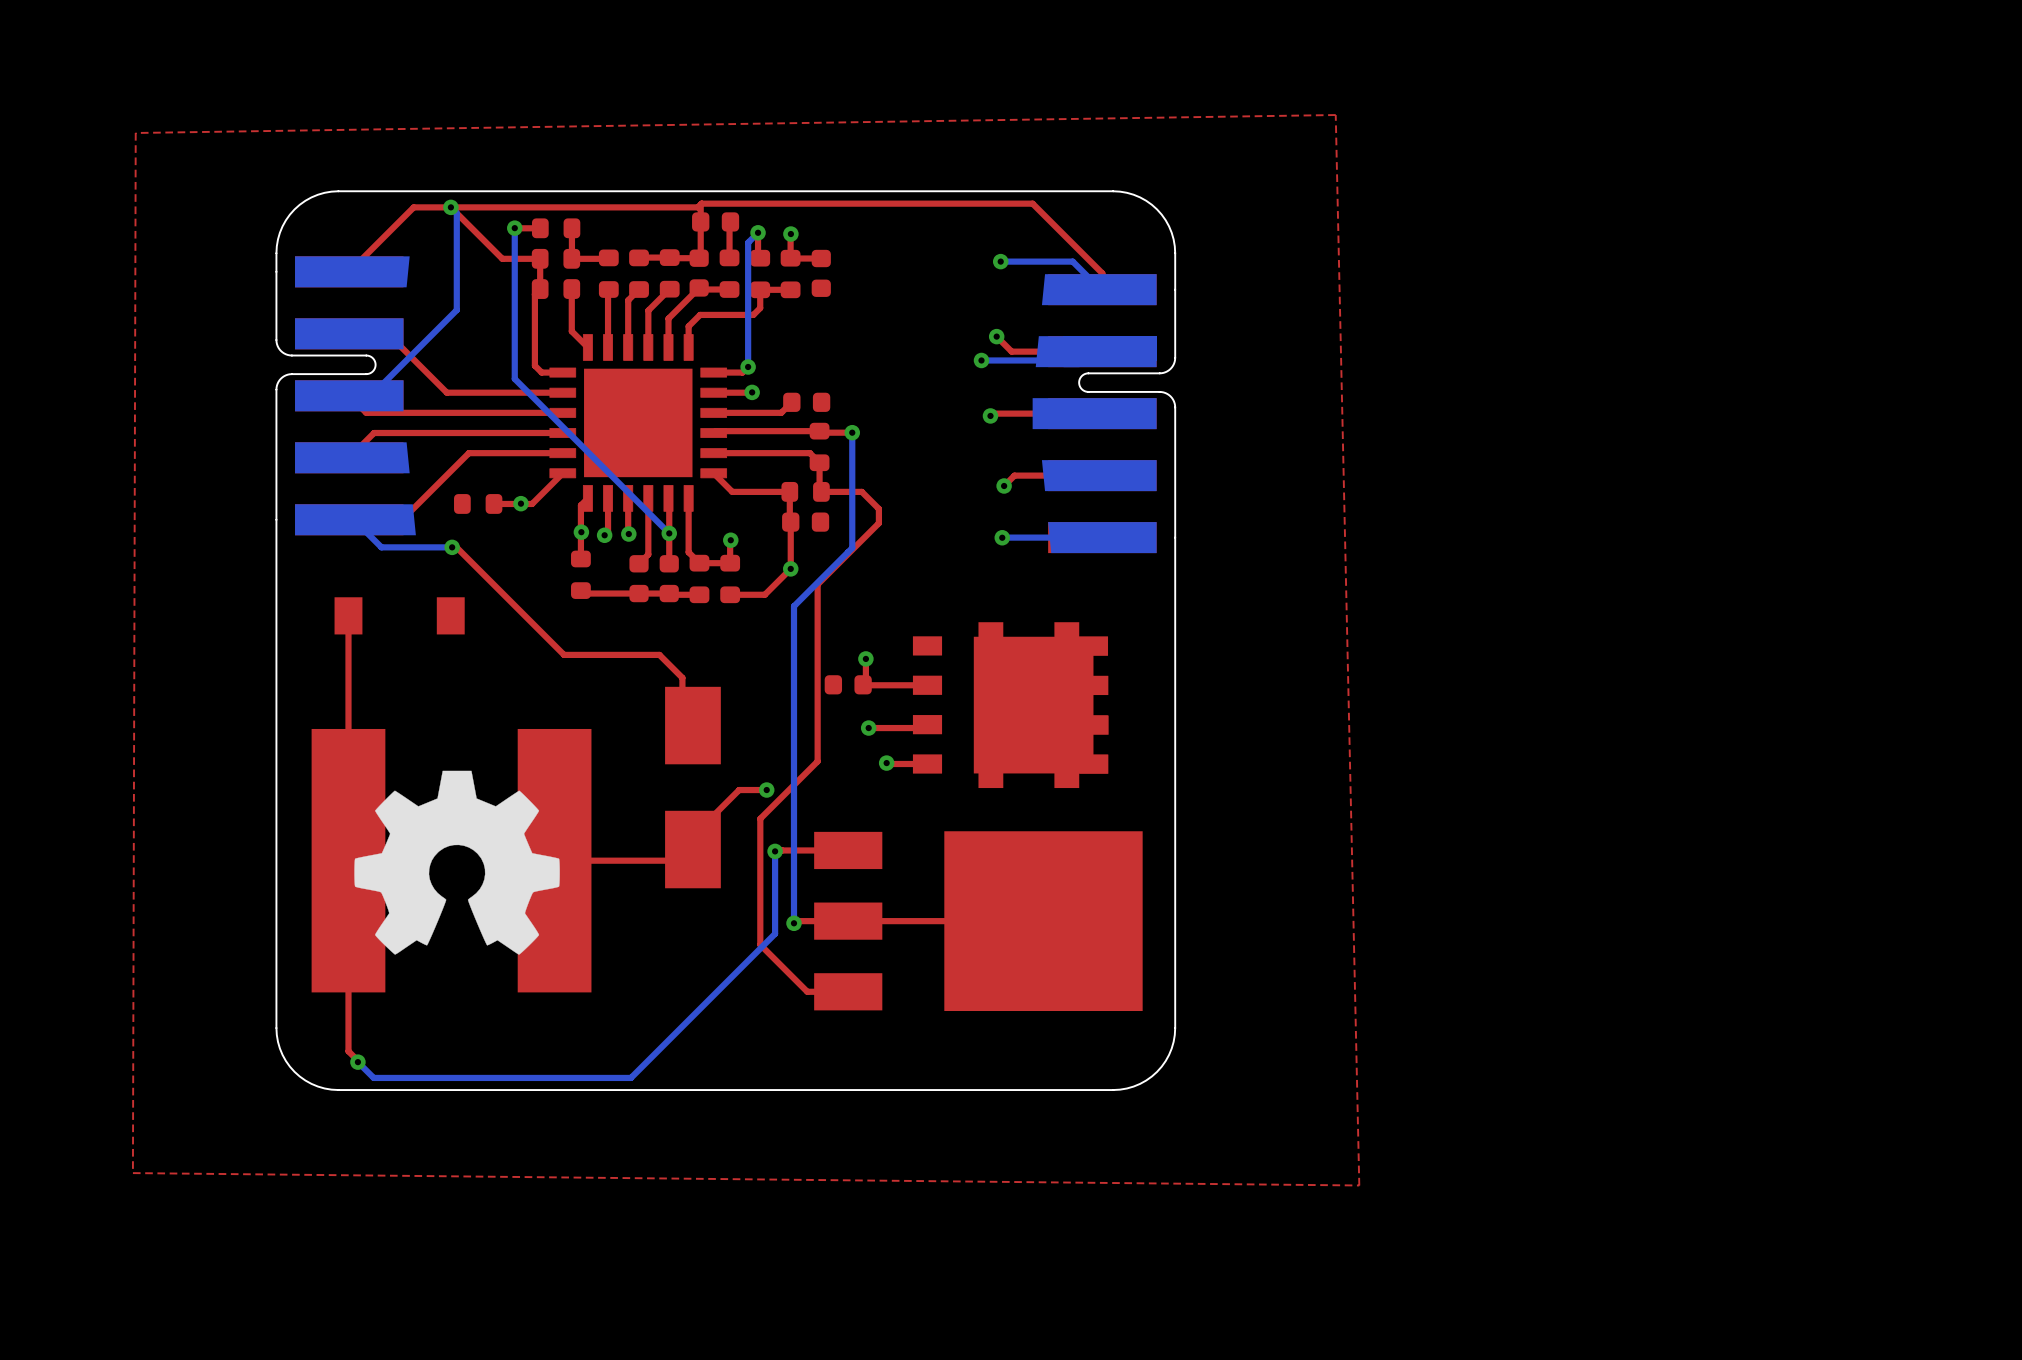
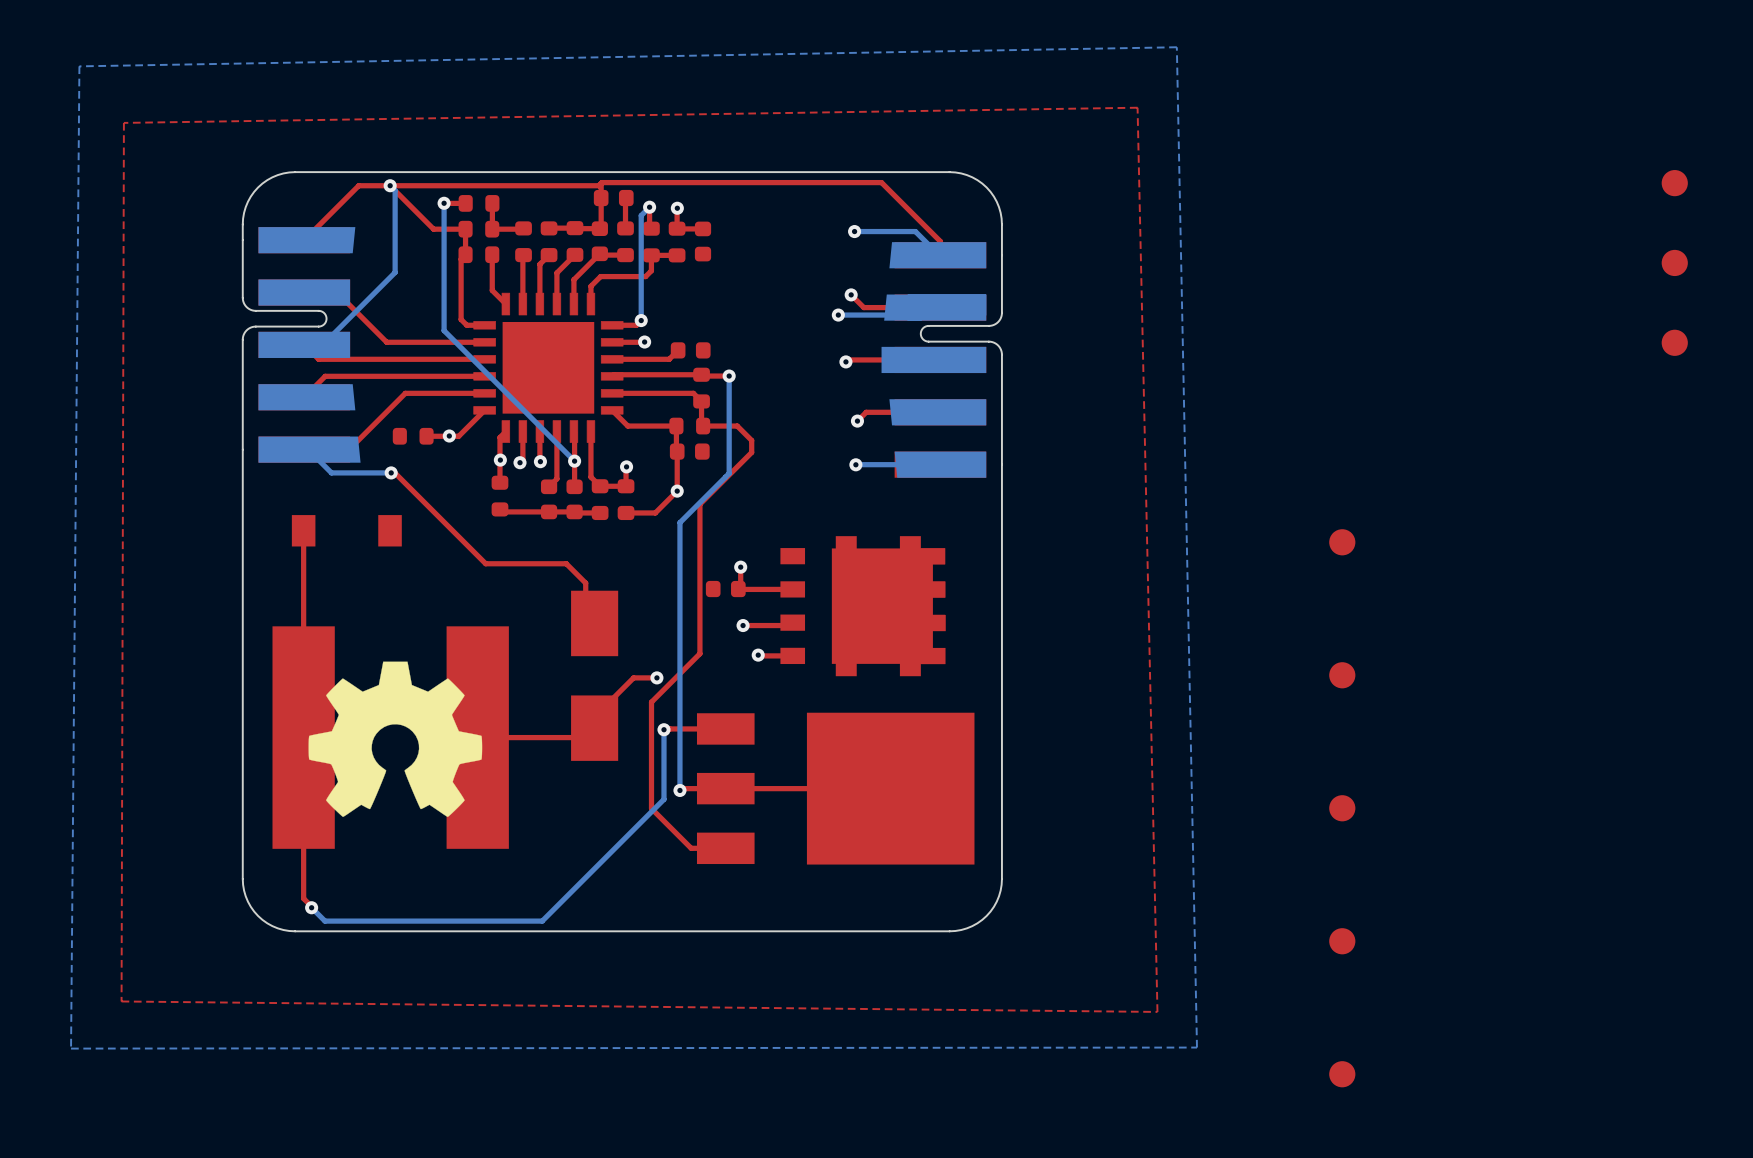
bottom zone outline: none -> (1176, 47) (79, 66) (71, 1048) (1196, 1047) (1176, 47)
part: none -> (1674, 183)
part: none -> (1674, 262)
part: none -> (1674, 342)
part: none -> (1342, 542)
part: none -> (1342, 675)
part: none -> (1342, 808)
part: none -> (1342, 941)
part: none -> (1342, 1074)

